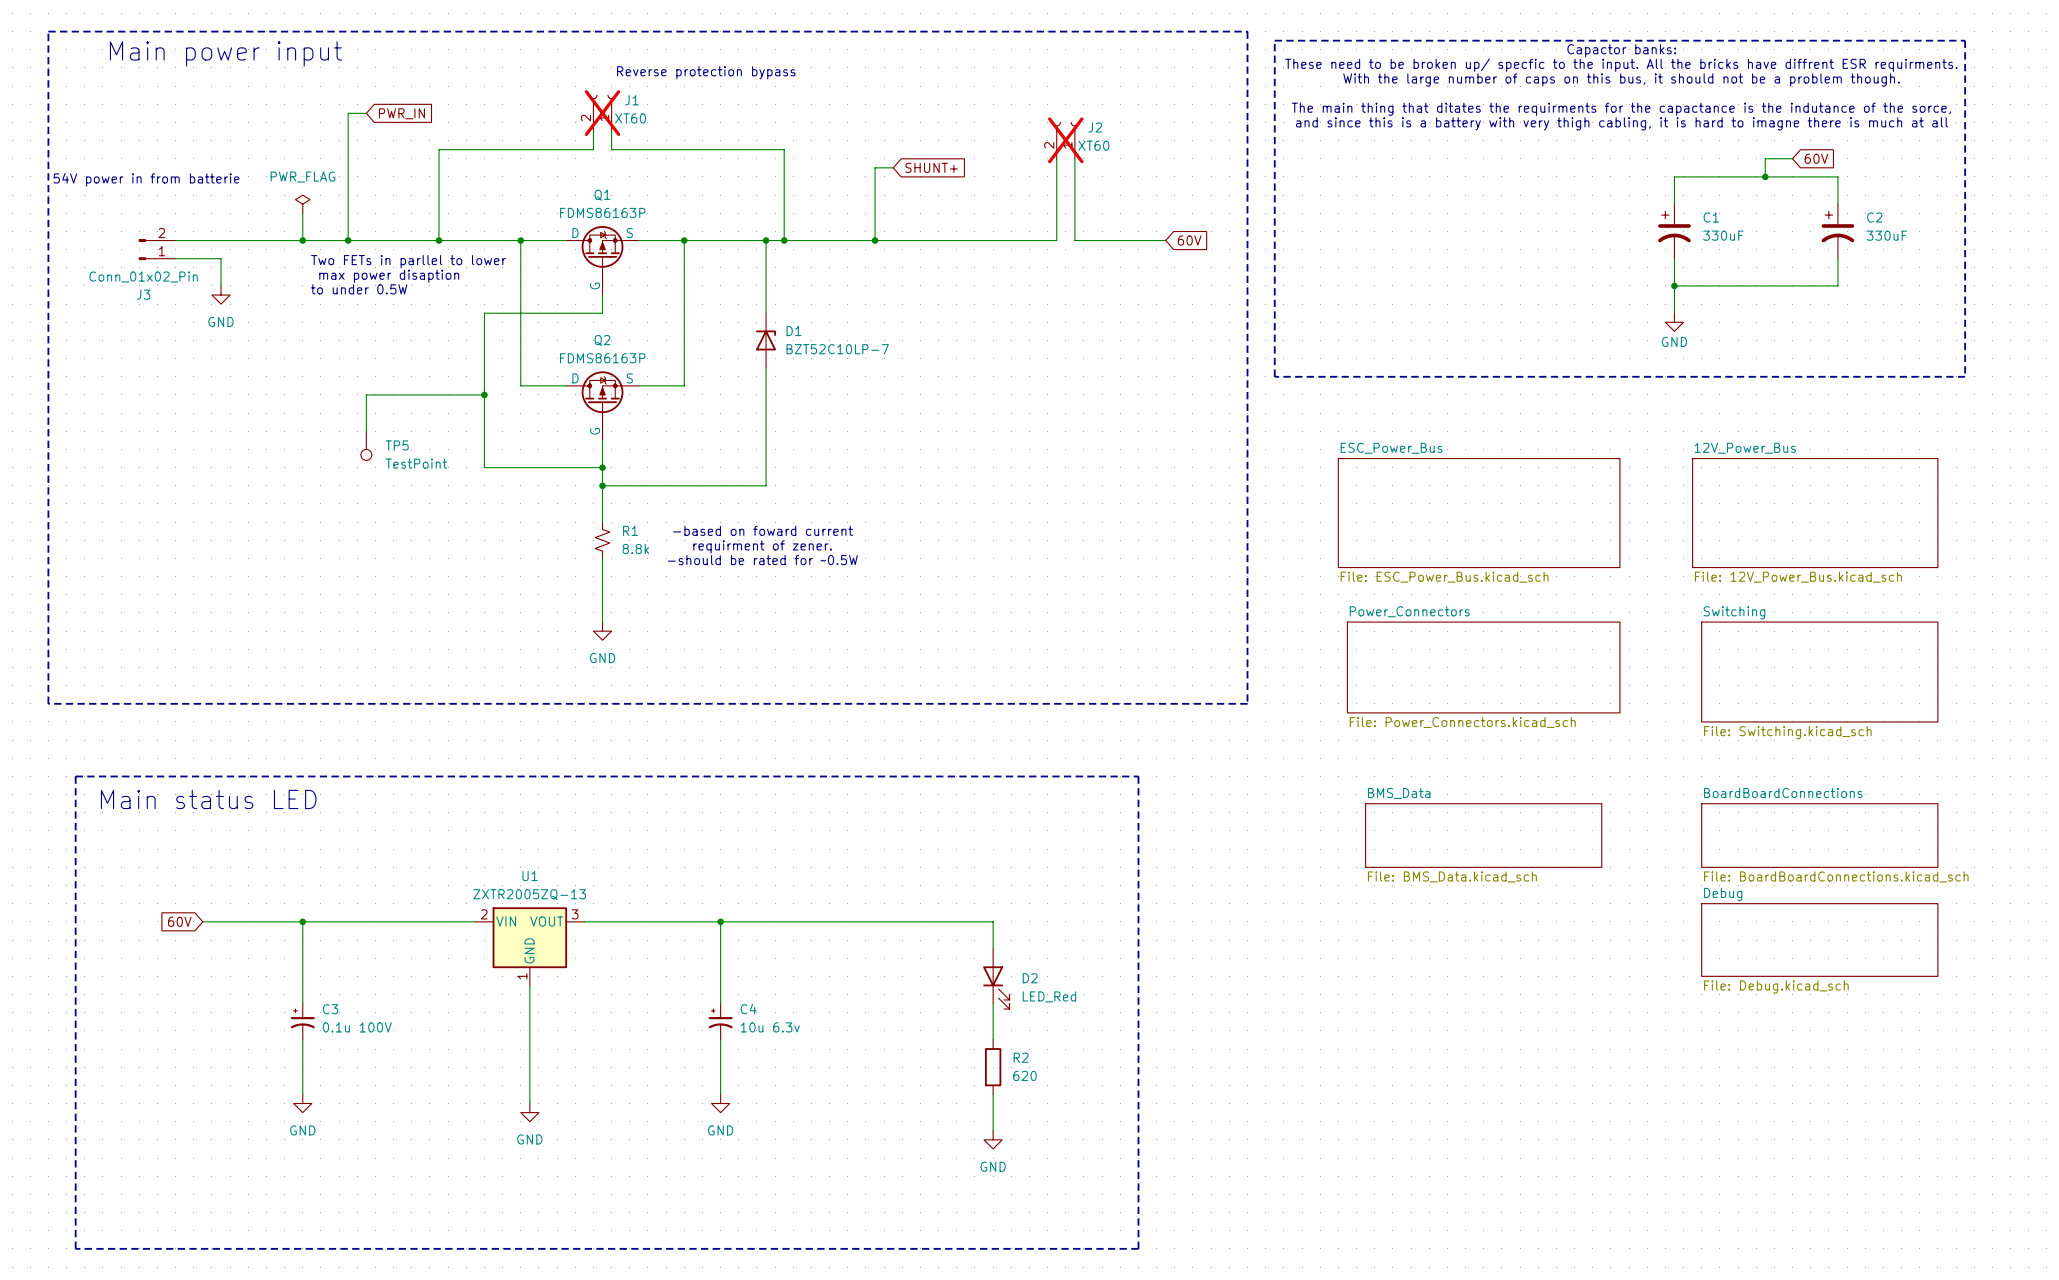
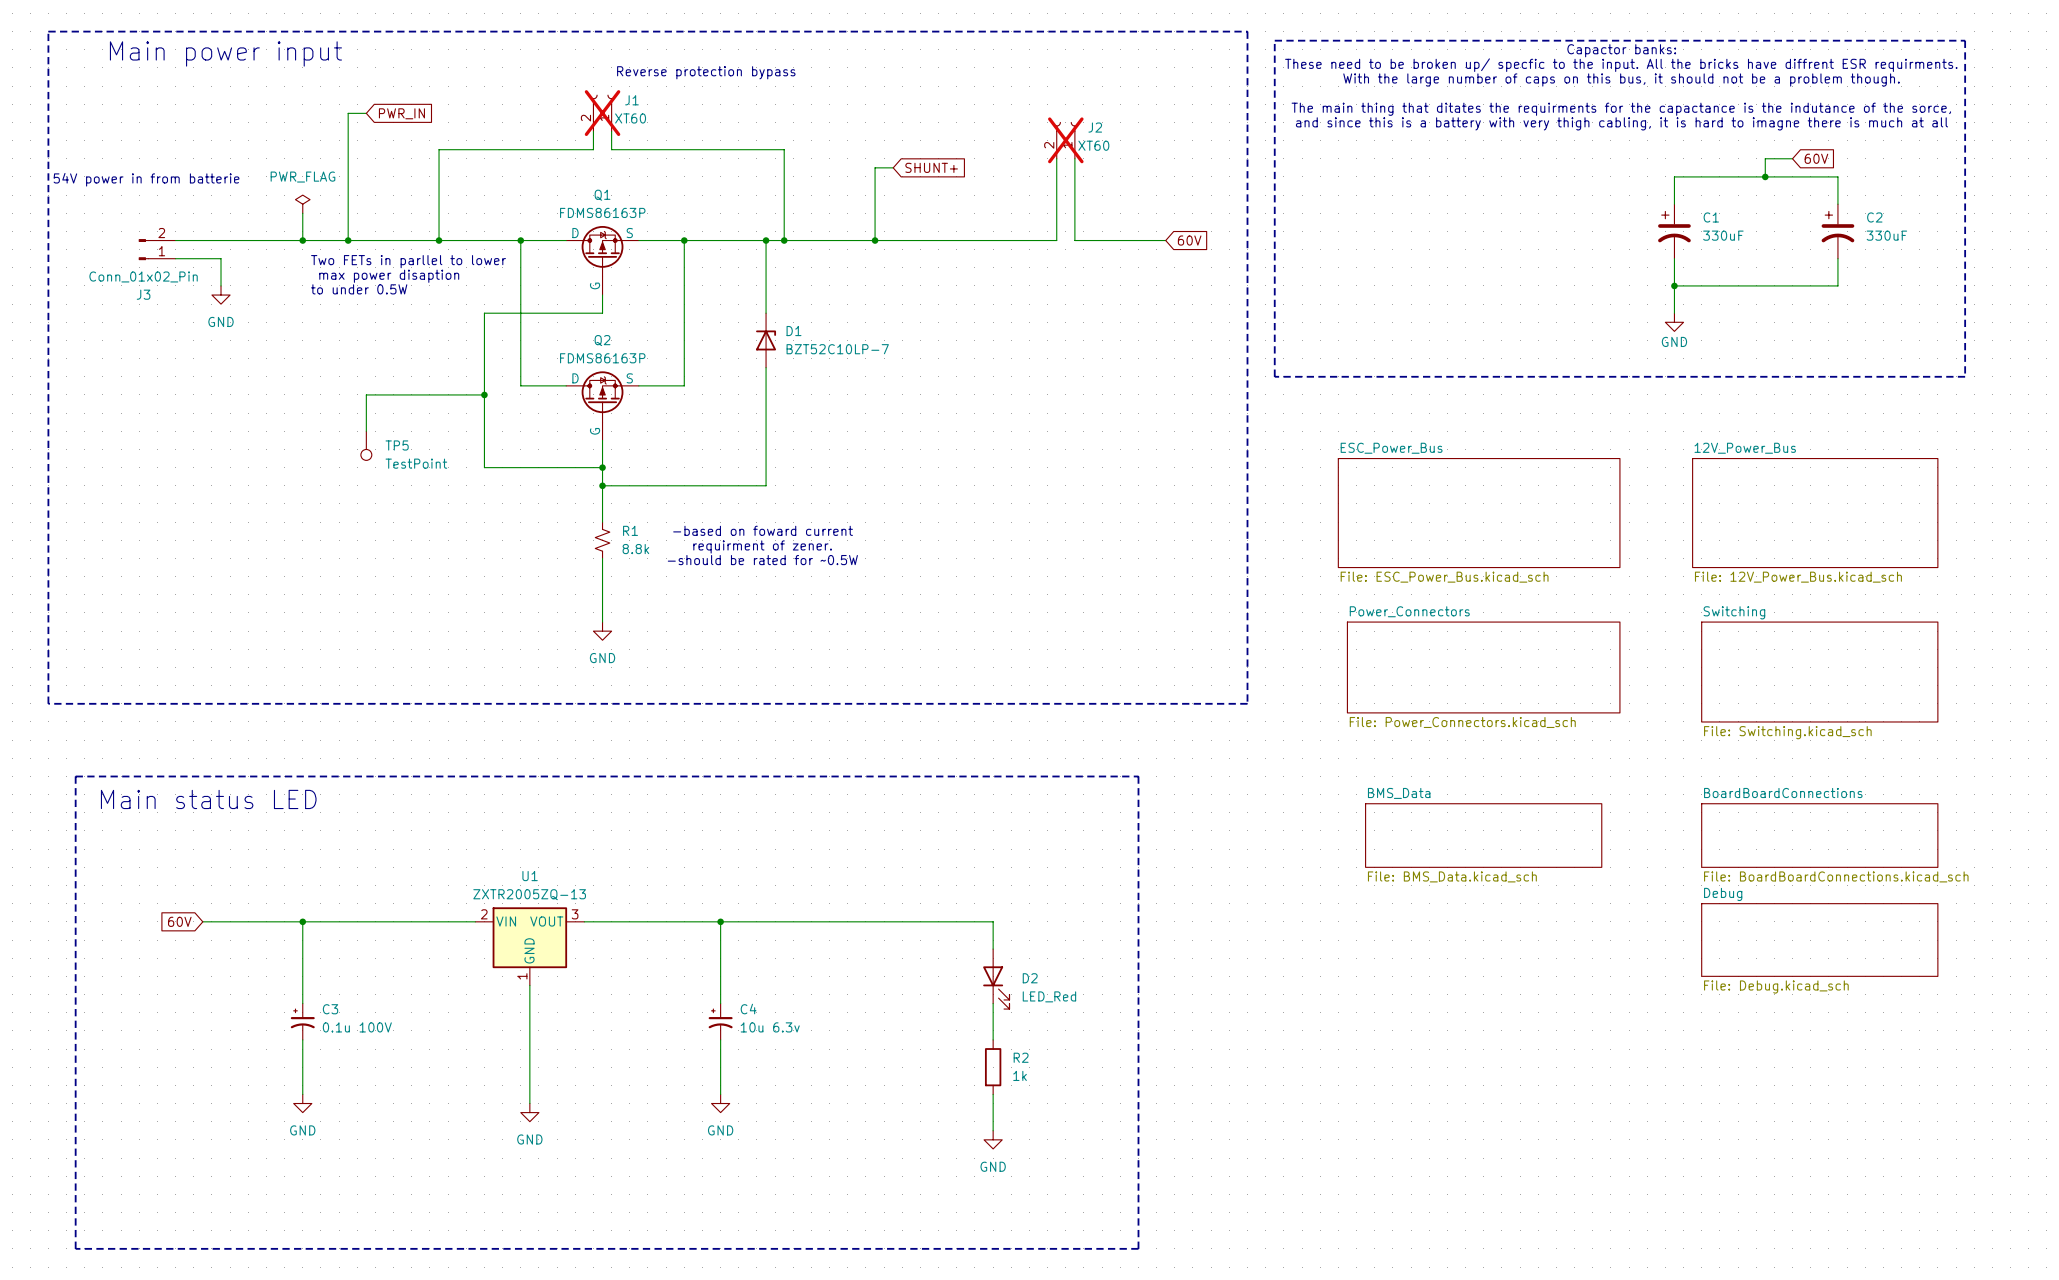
R2 value: 620 (1025, 1075) -> 1k (1020, 1075)

